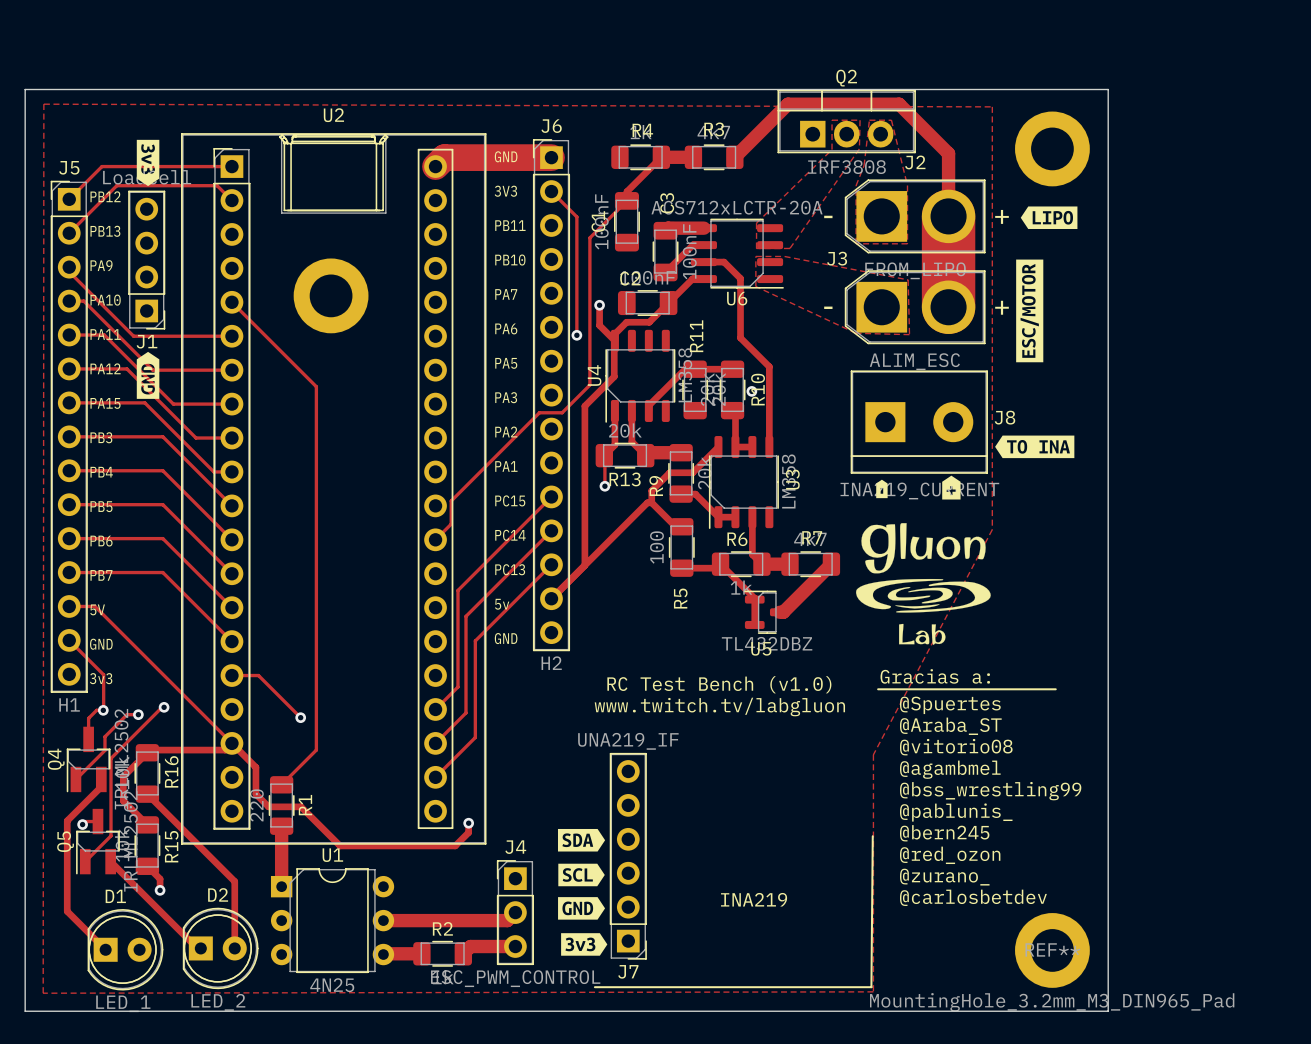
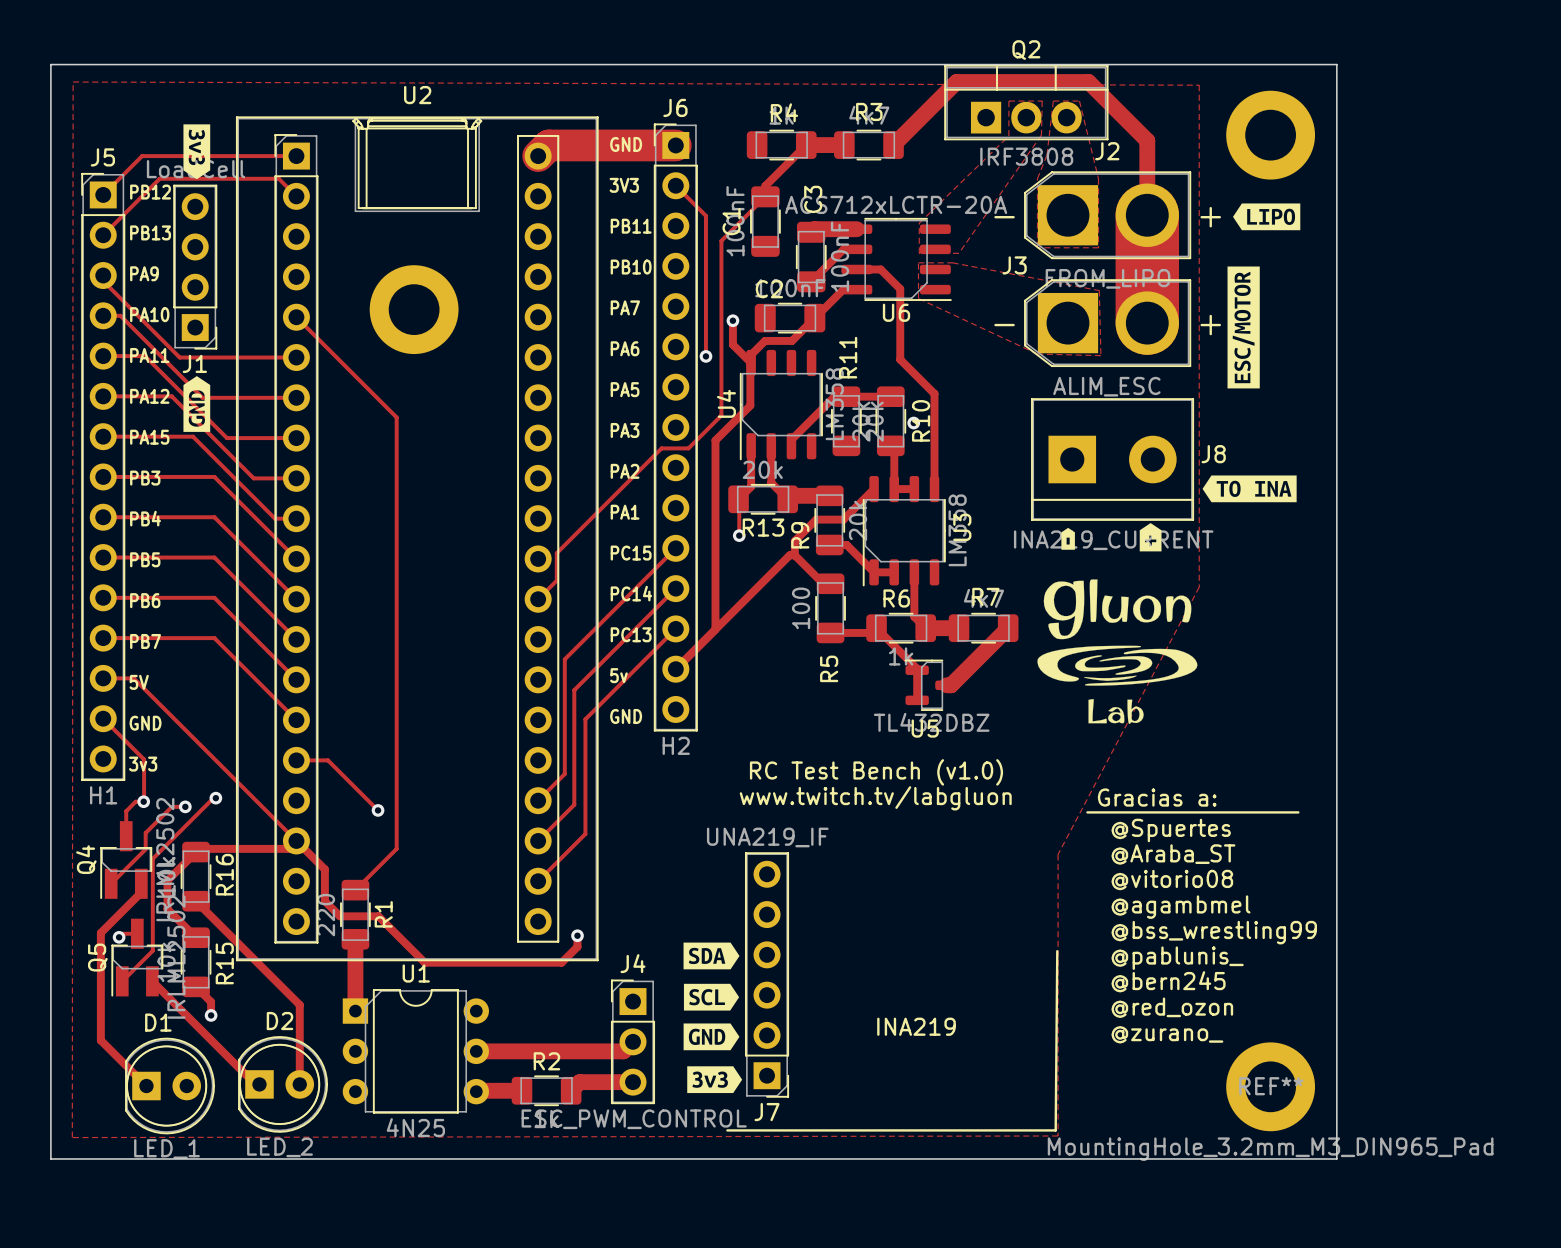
text position: Gracias a: (935, 676) -> Gracias a: (1157, 797)
line: (878, 689) (1055, 689) -> (1087, 812) (1298, 812)
text position: @Spuertes (950, 705) -> @Spuertes (1171, 830)
text position: @Araba_ST (950, 726) -> @Araba_ST (1173, 854)
text position: @vitorio08 (956, 747) -> @vitorio08 (1172, 880)
text position: @agambmel (950, 769) -> @agambmel (1180, 907)
text position: @bss_wrestling99 (990, 791) -> @bss_wrestling99 (1214, 932)
text position: @pablunis_ (956, 812) -> @pablunis_ (1177, 958)
text position: @bern245 (944, 833) -> @bern245 (1168, 981)
text position: @red_ozon (950, 855) -> @red_ozon (1172, 1007)
text position: @zurano_ (944, 877) -> @zurano_ (1167, 1034)
text: @carlosbetdev (973, 897) -> none

